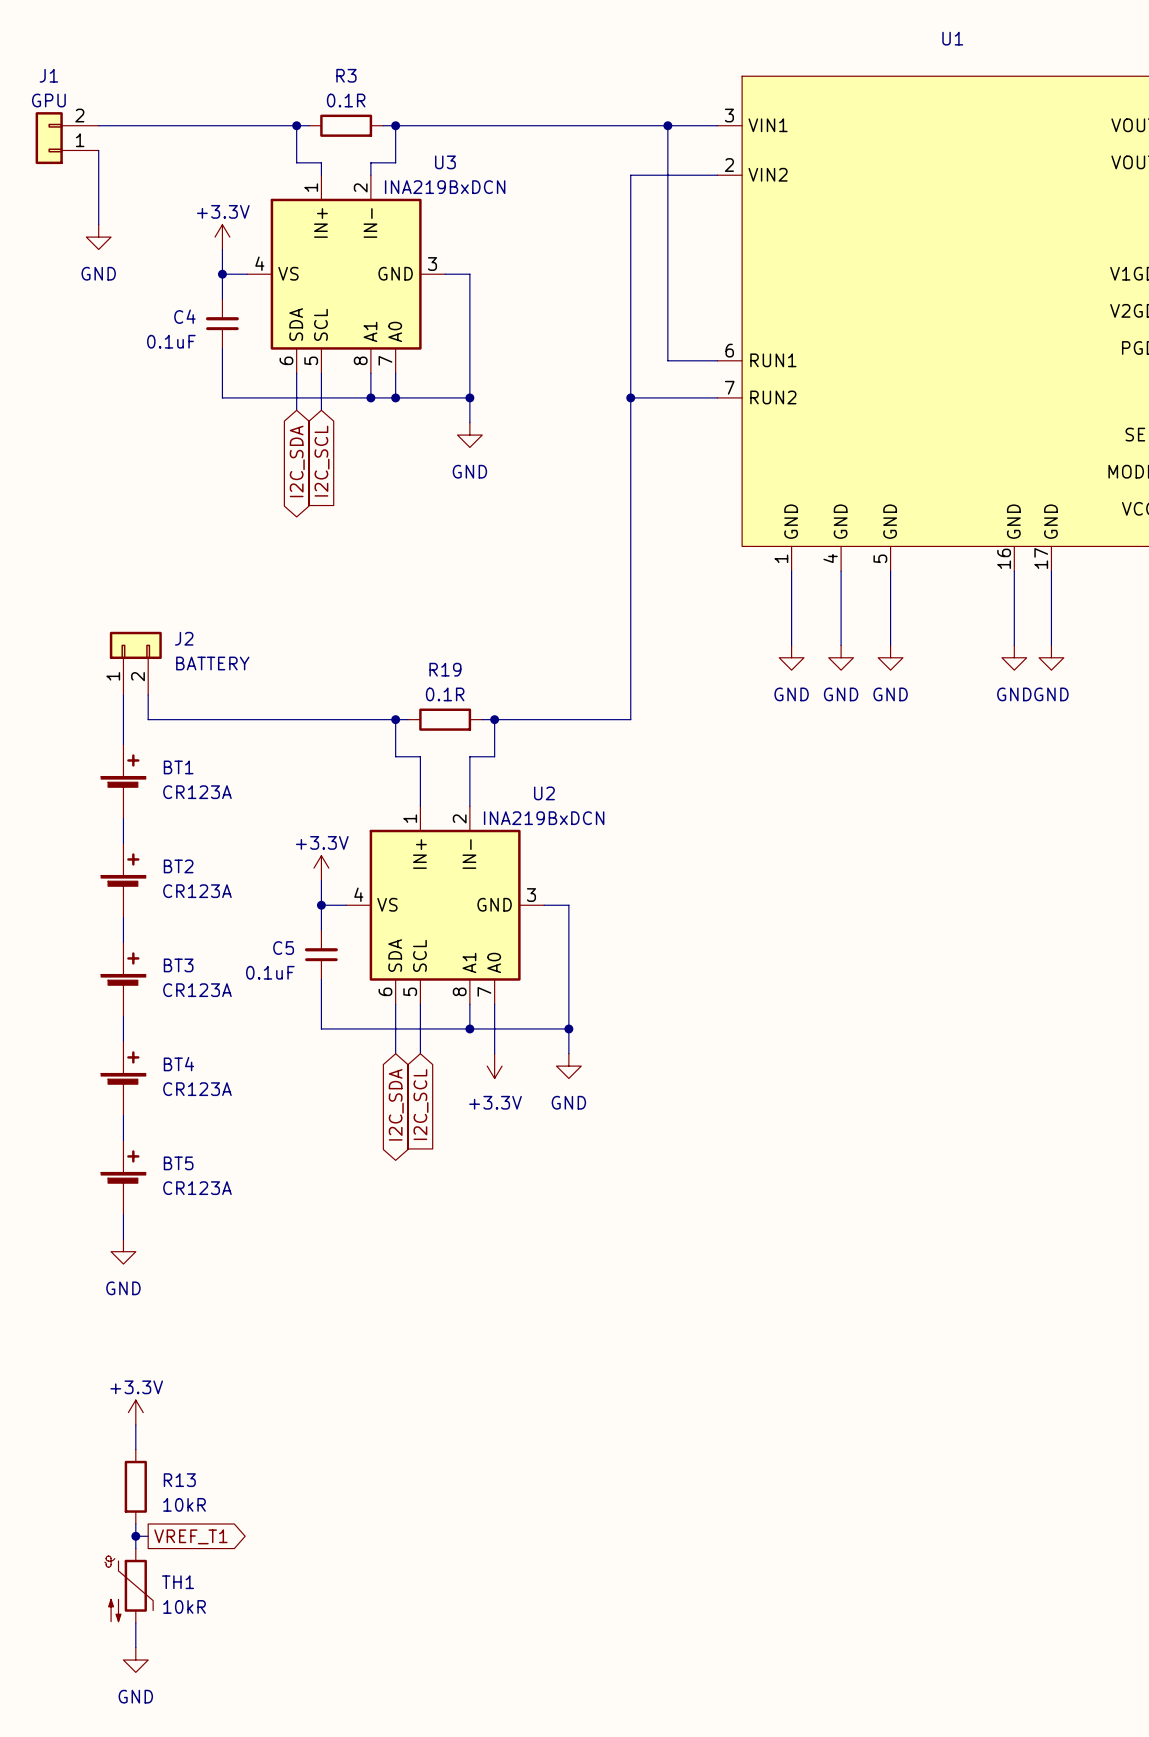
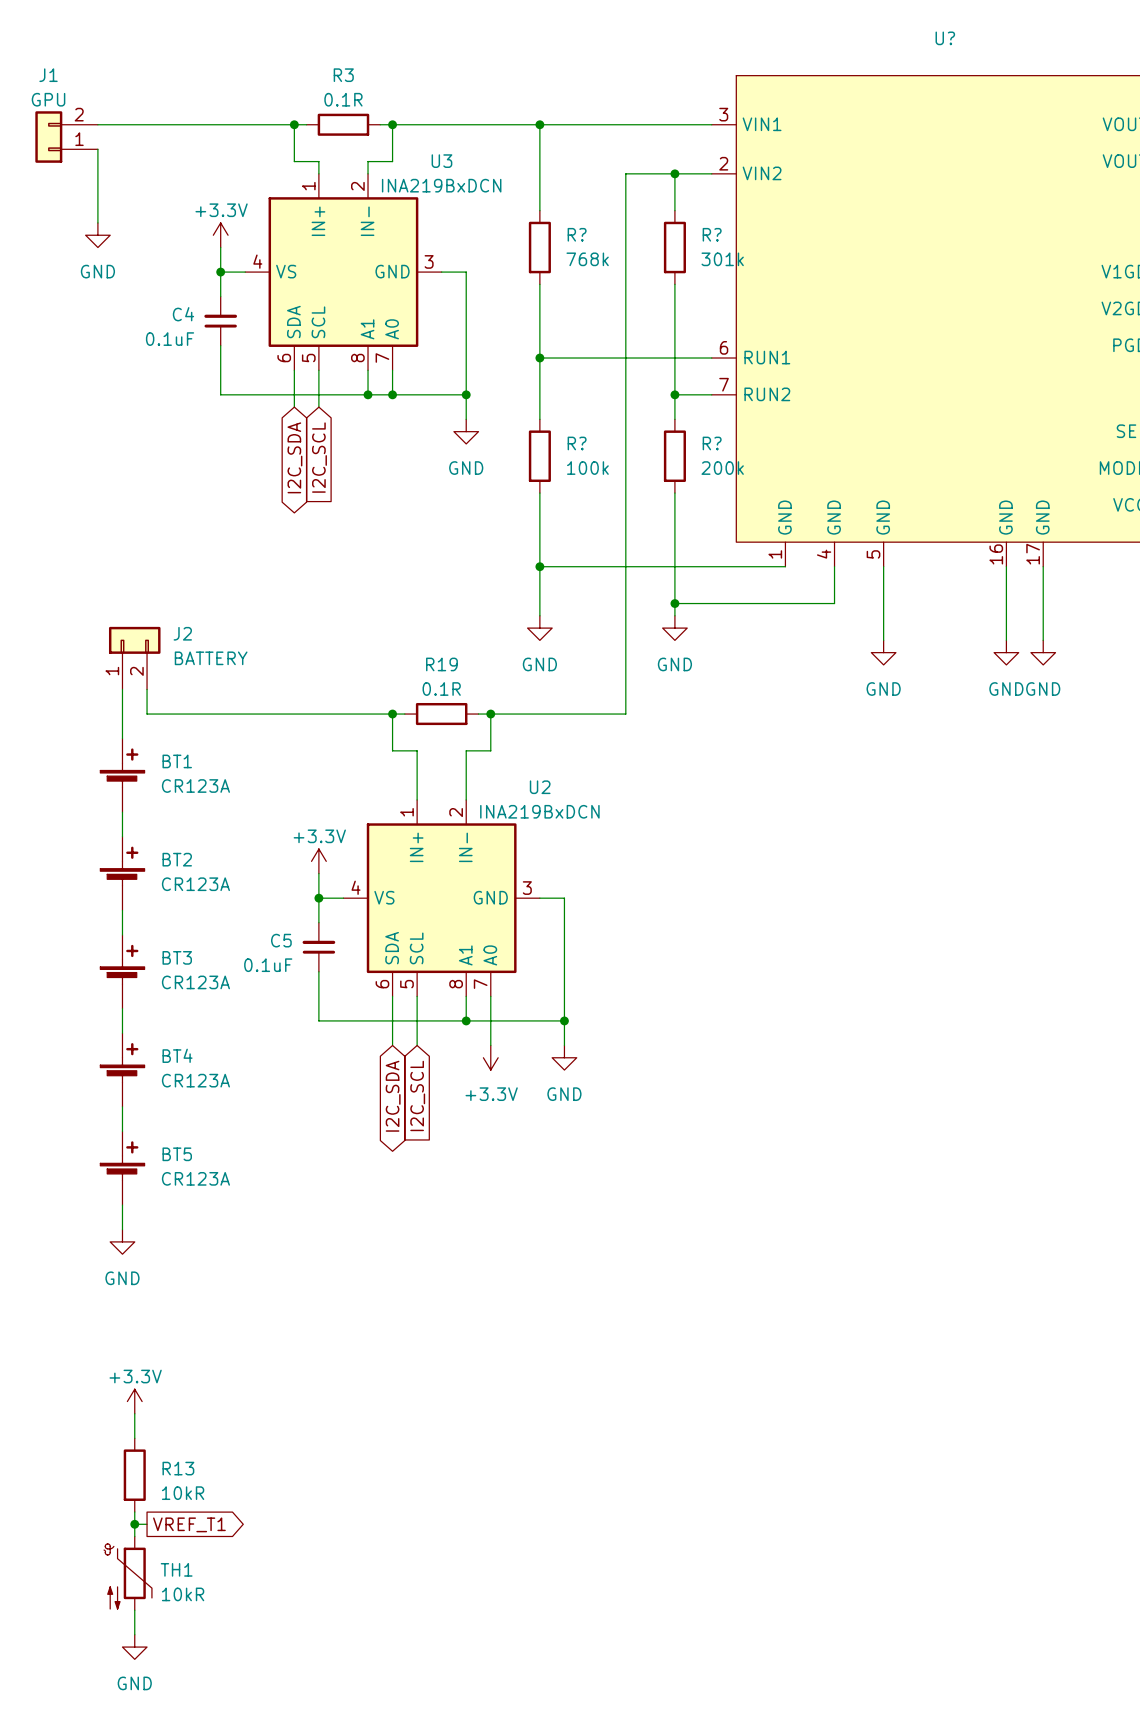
U1 name: U1 (952, 38) -> U? (945, 38)
wire: none -> (539, 124) (539, 210)
junction: none -> (539, 124)
wire: (667, 125) (667, 360) -> (539, 358) (662, 358)
junction position: (667, 125) -> (674, 173)
wire: none -> (674, 173) (674, 210)
R?: none -> 768k (539, 247)
R?: none -> 301k (674, 247)
wire: none -> (539, 284) (539, 419)
wire: none -> (674, 284) (674, 419)
junction: none -> (539, 358)
wire: (630, 397) (680, 397) -> none
junction: (630, 397) -> none
junction: none -> (674, 394)
R?: none -> 100k (539, 456)
R?: none -> 200k (674, 456)
wire: none -> (539, 493) (539, 615)
wire: none -> (674, 493) (674, 615)
junction: none -> (539, 566)
wire: (791, 571) (791, 645) -> (785, 566) (539, 566)
junction: none -> (674, 603)
wire: (841, 608) (841, 645) -> (834, 603) (674, 603)
power symbol: none -> GND (539, 628)
power symbol: none -> GND (674, 628)
power symbol: GND (791, 657) -> none
power symbol: GND (841, 657) -> none

